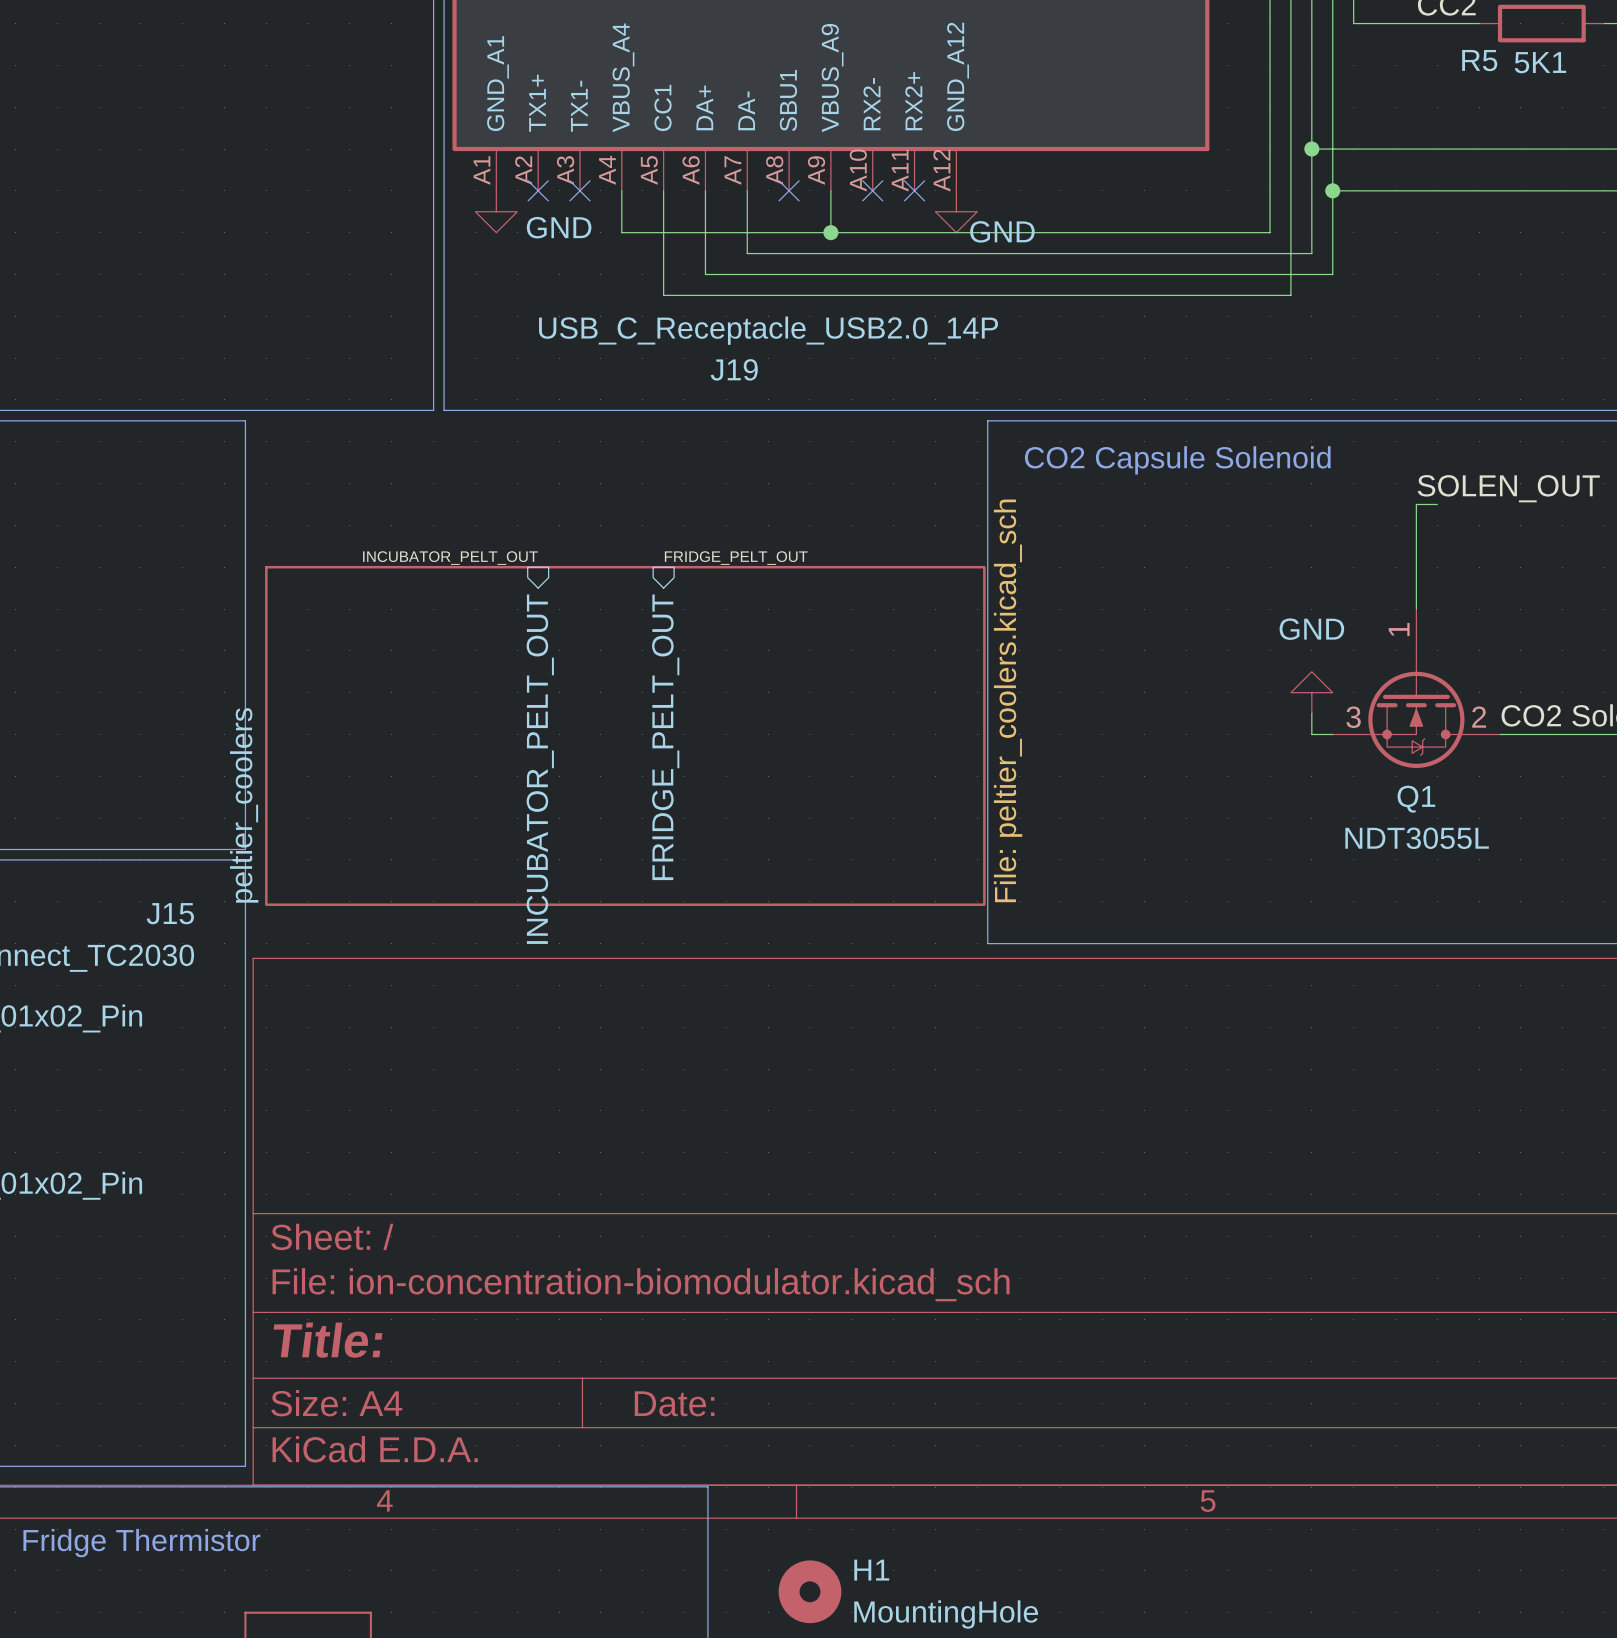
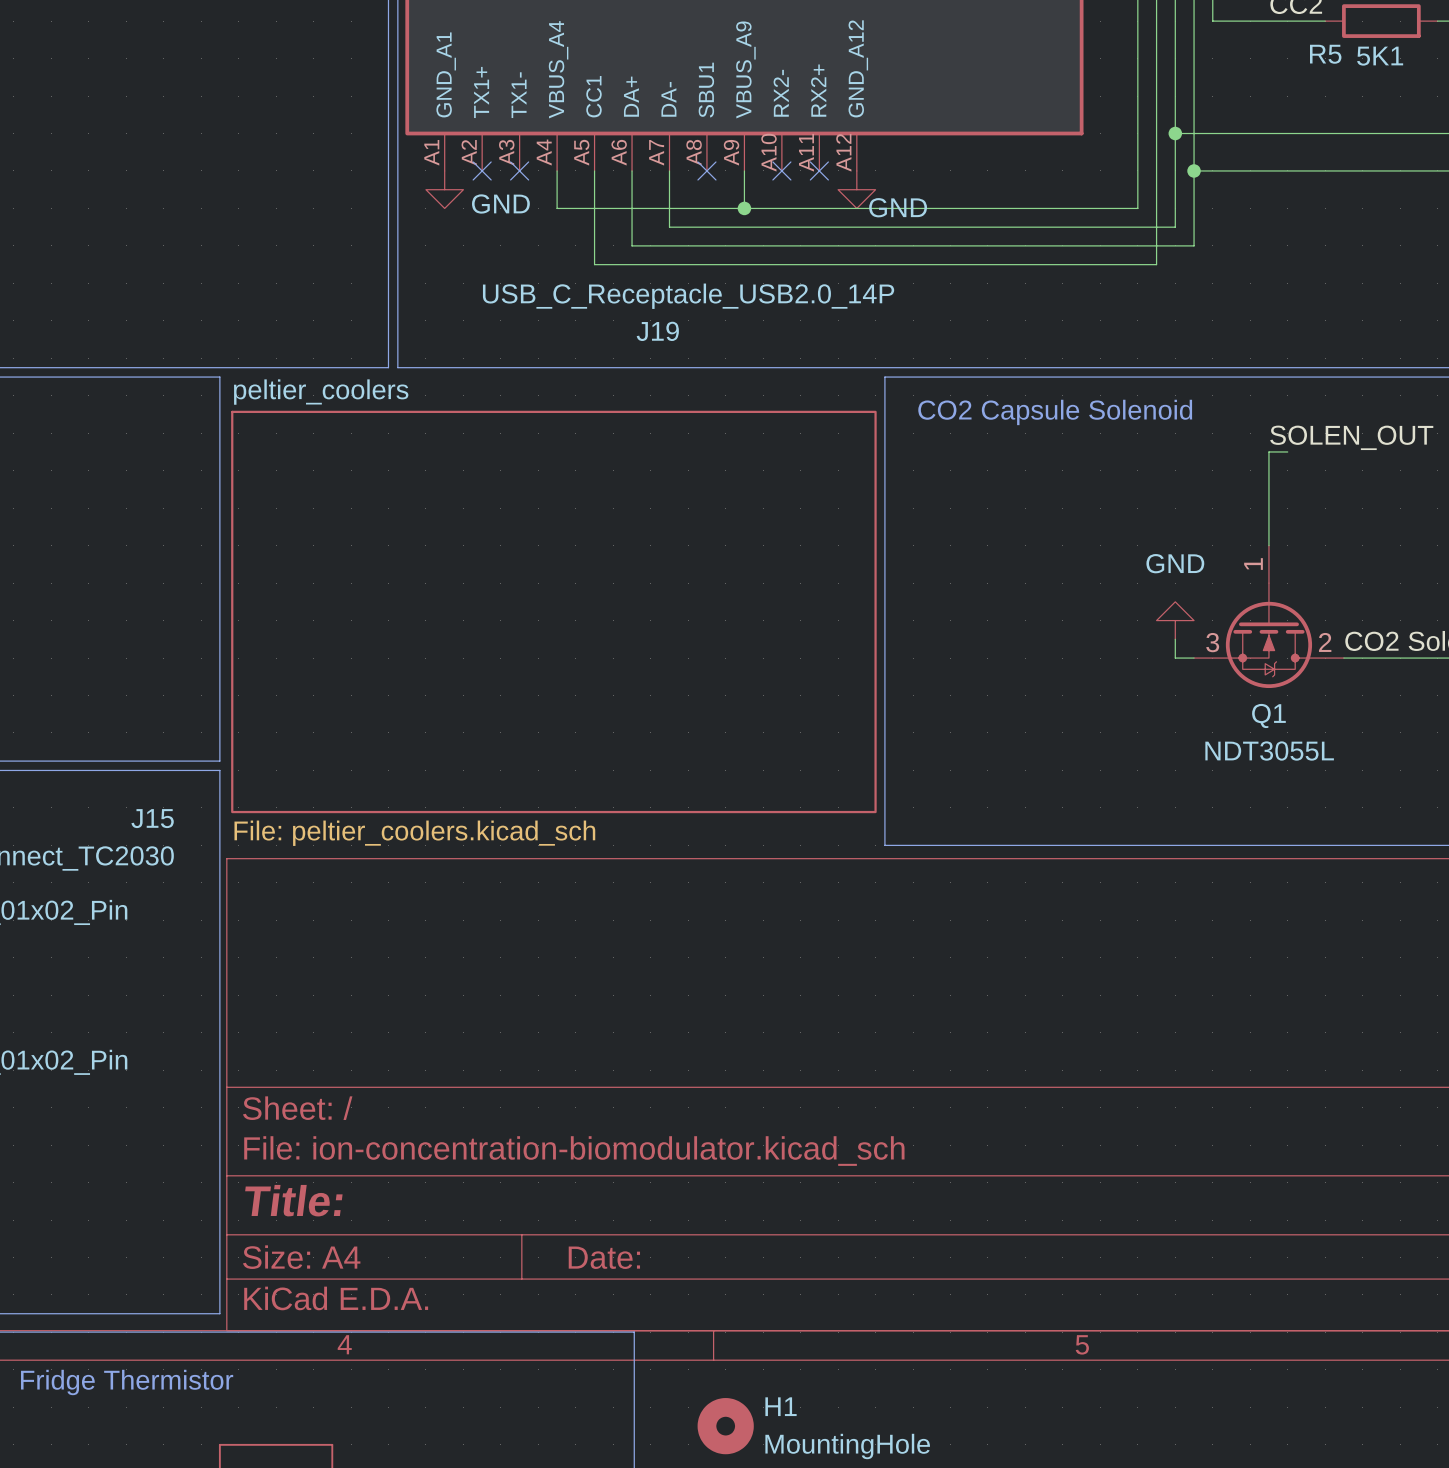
label: INCUBATOR_PELT_OUT (450, 558) -> none
label: FRIDGE_PELT_OUT (736, 558) -> none
sheet peltier_coolers: none -> File: peltier_coolers.kicad_sch (553, 611)
sheet peltier_coolers: File: peltier_coolers.kicad_sch (625, 735) -> none
sheet pin: FRIDGE_PELT_OUT (665, 737) -> none
sheet pin: INCUBATOR_PELT_OUT (540, 769) -> none

